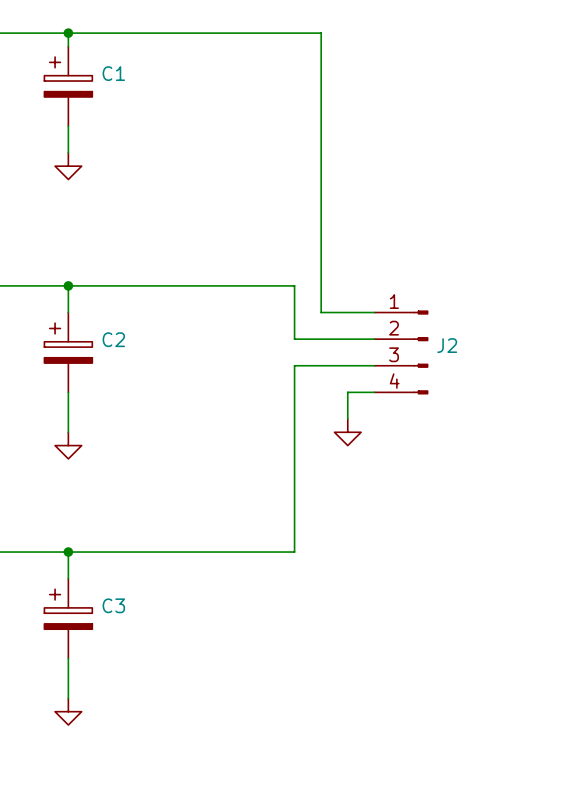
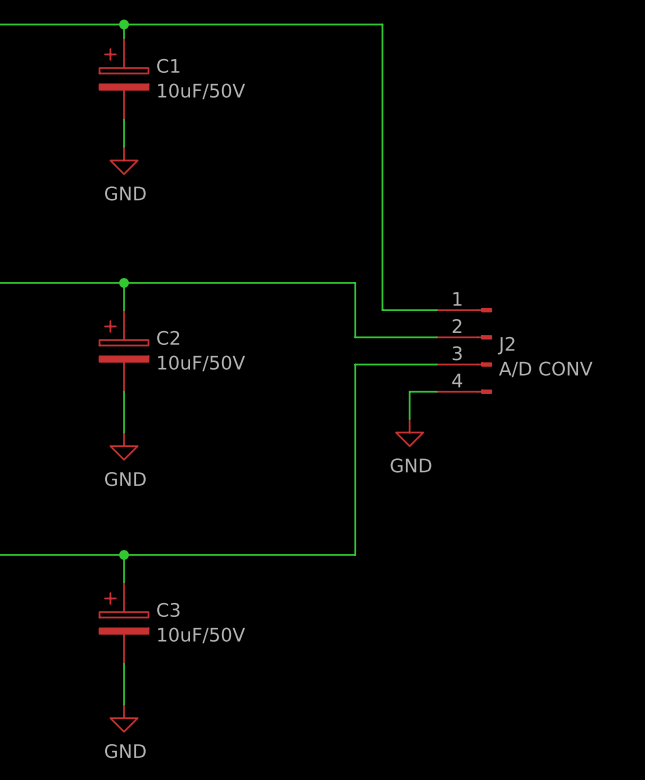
C1 value: none -> 10uF/50V (201, 91)
power symbol text: none -> GND (125, 193)
C2 value: none -> 10uF/50V (201, 363)
J2 value: none -> A/D CONV (545, 369)
power symbol text: none -> GND (410, 465)
power symbol text: none -> GND (125, 479)
C3 value: none -> 10uF/50V (201, 635)
power symbol text: none -> GND (125, 751)

